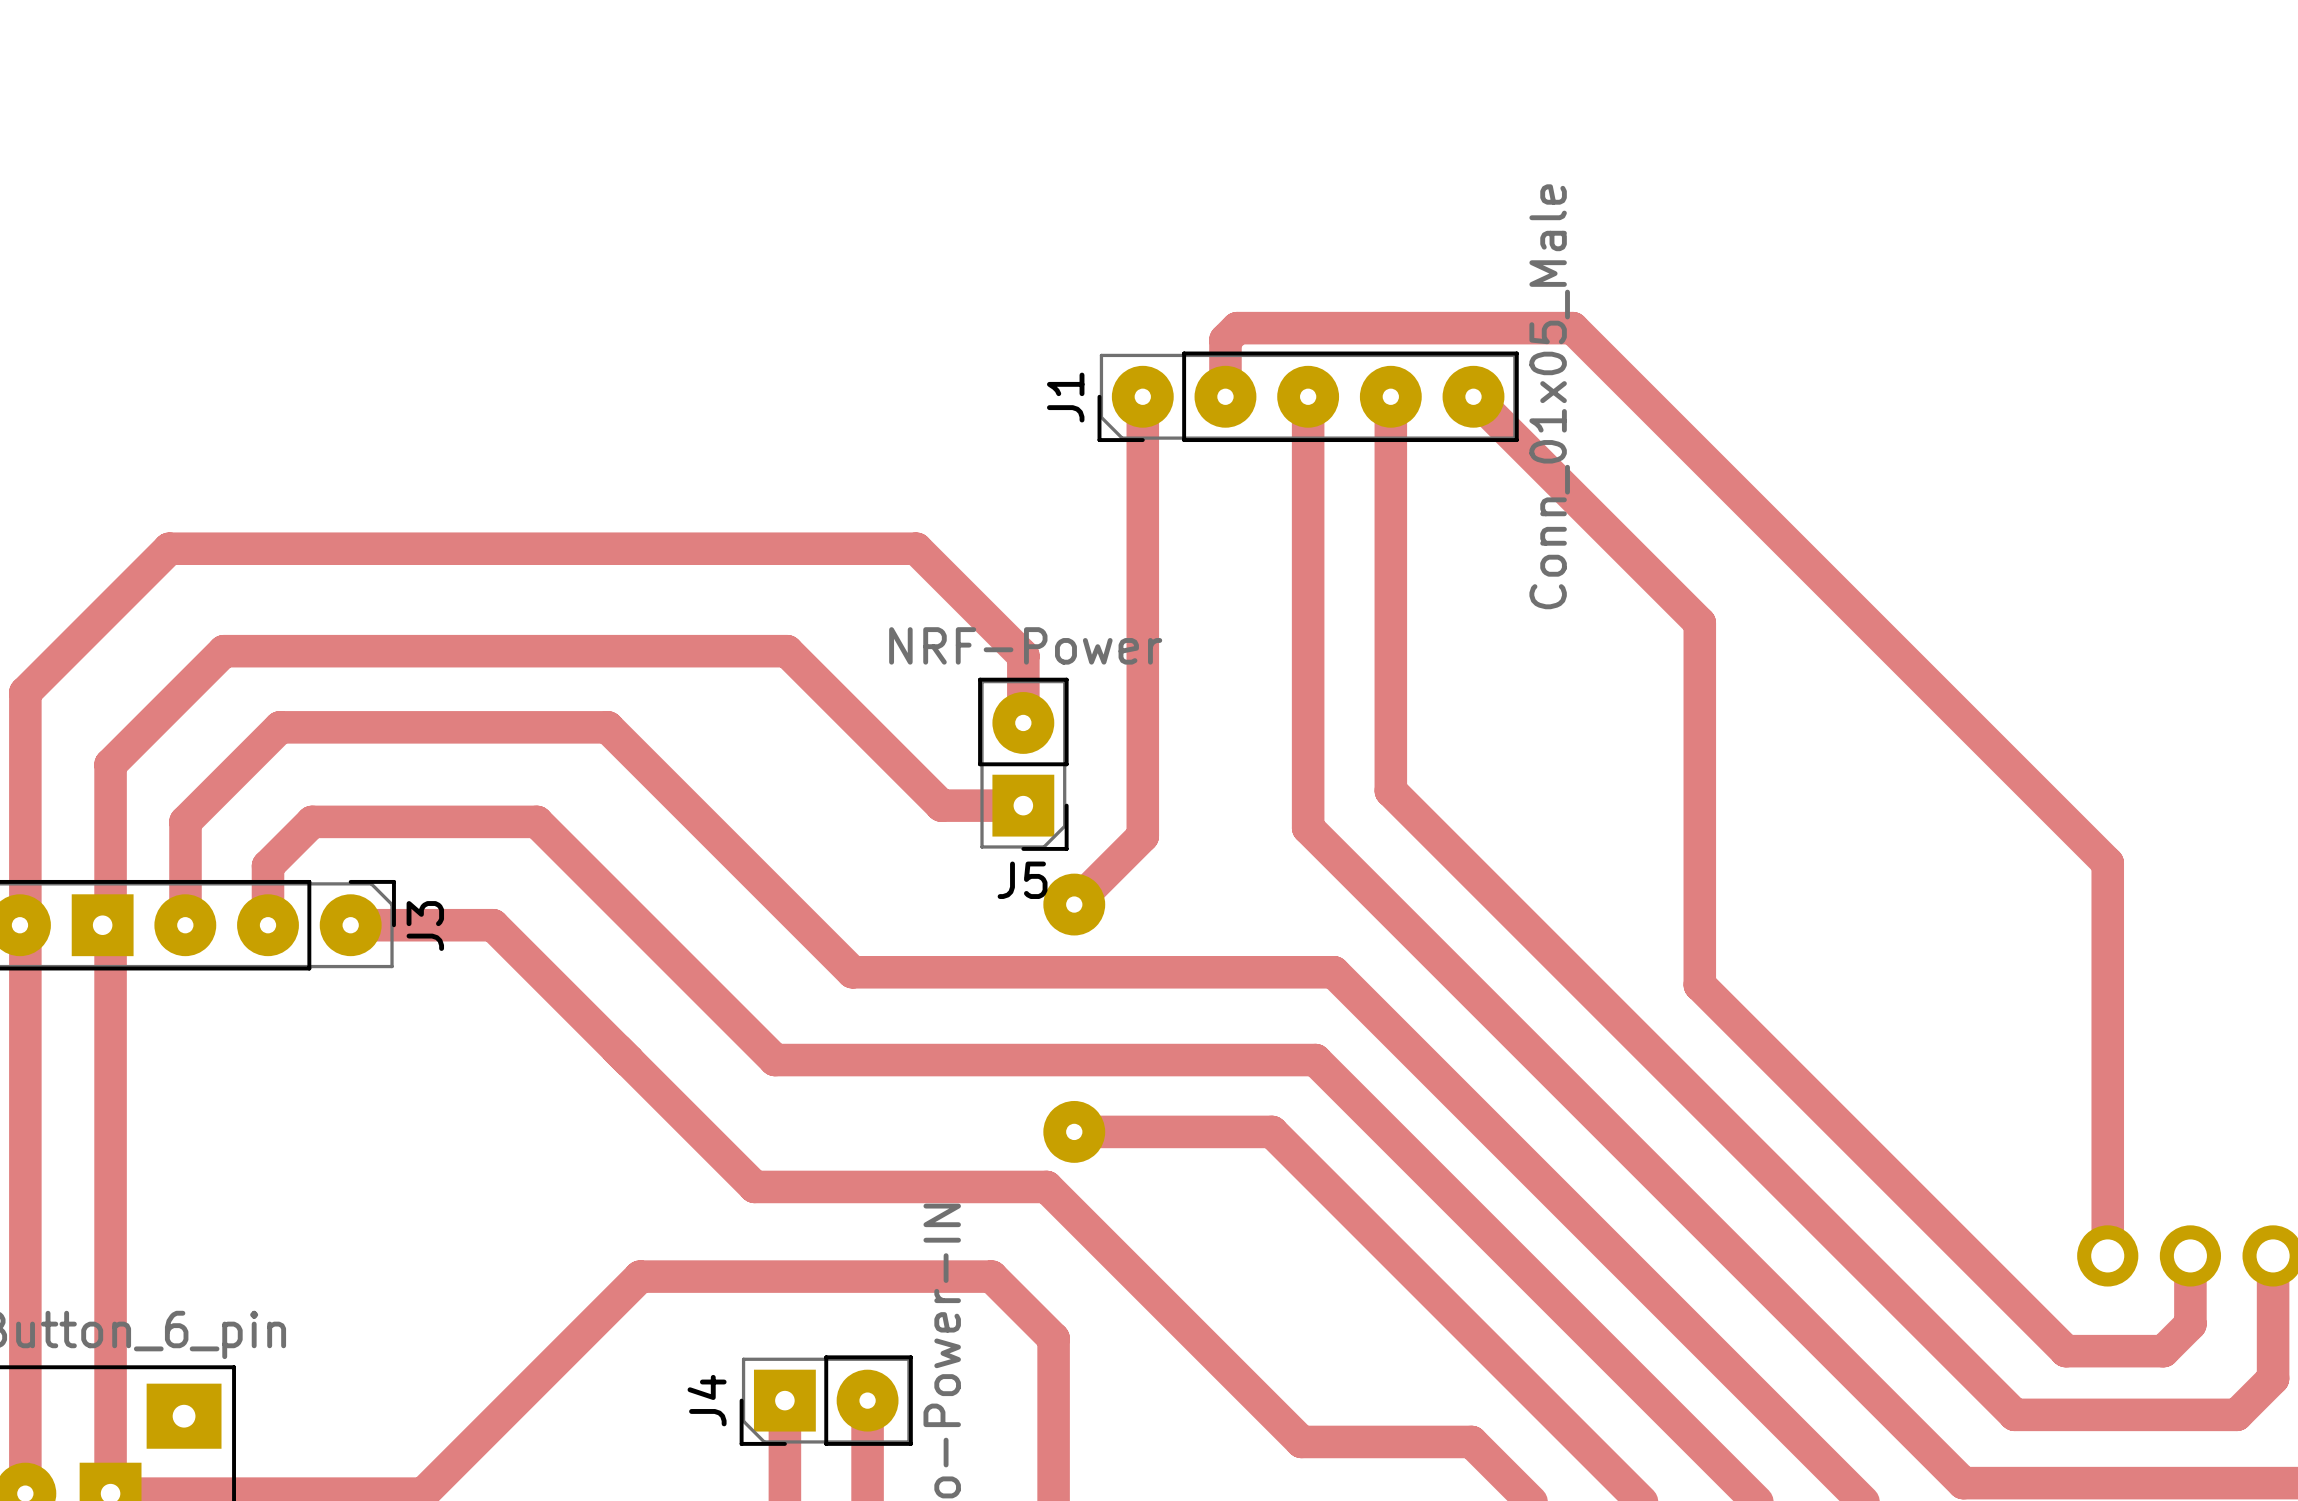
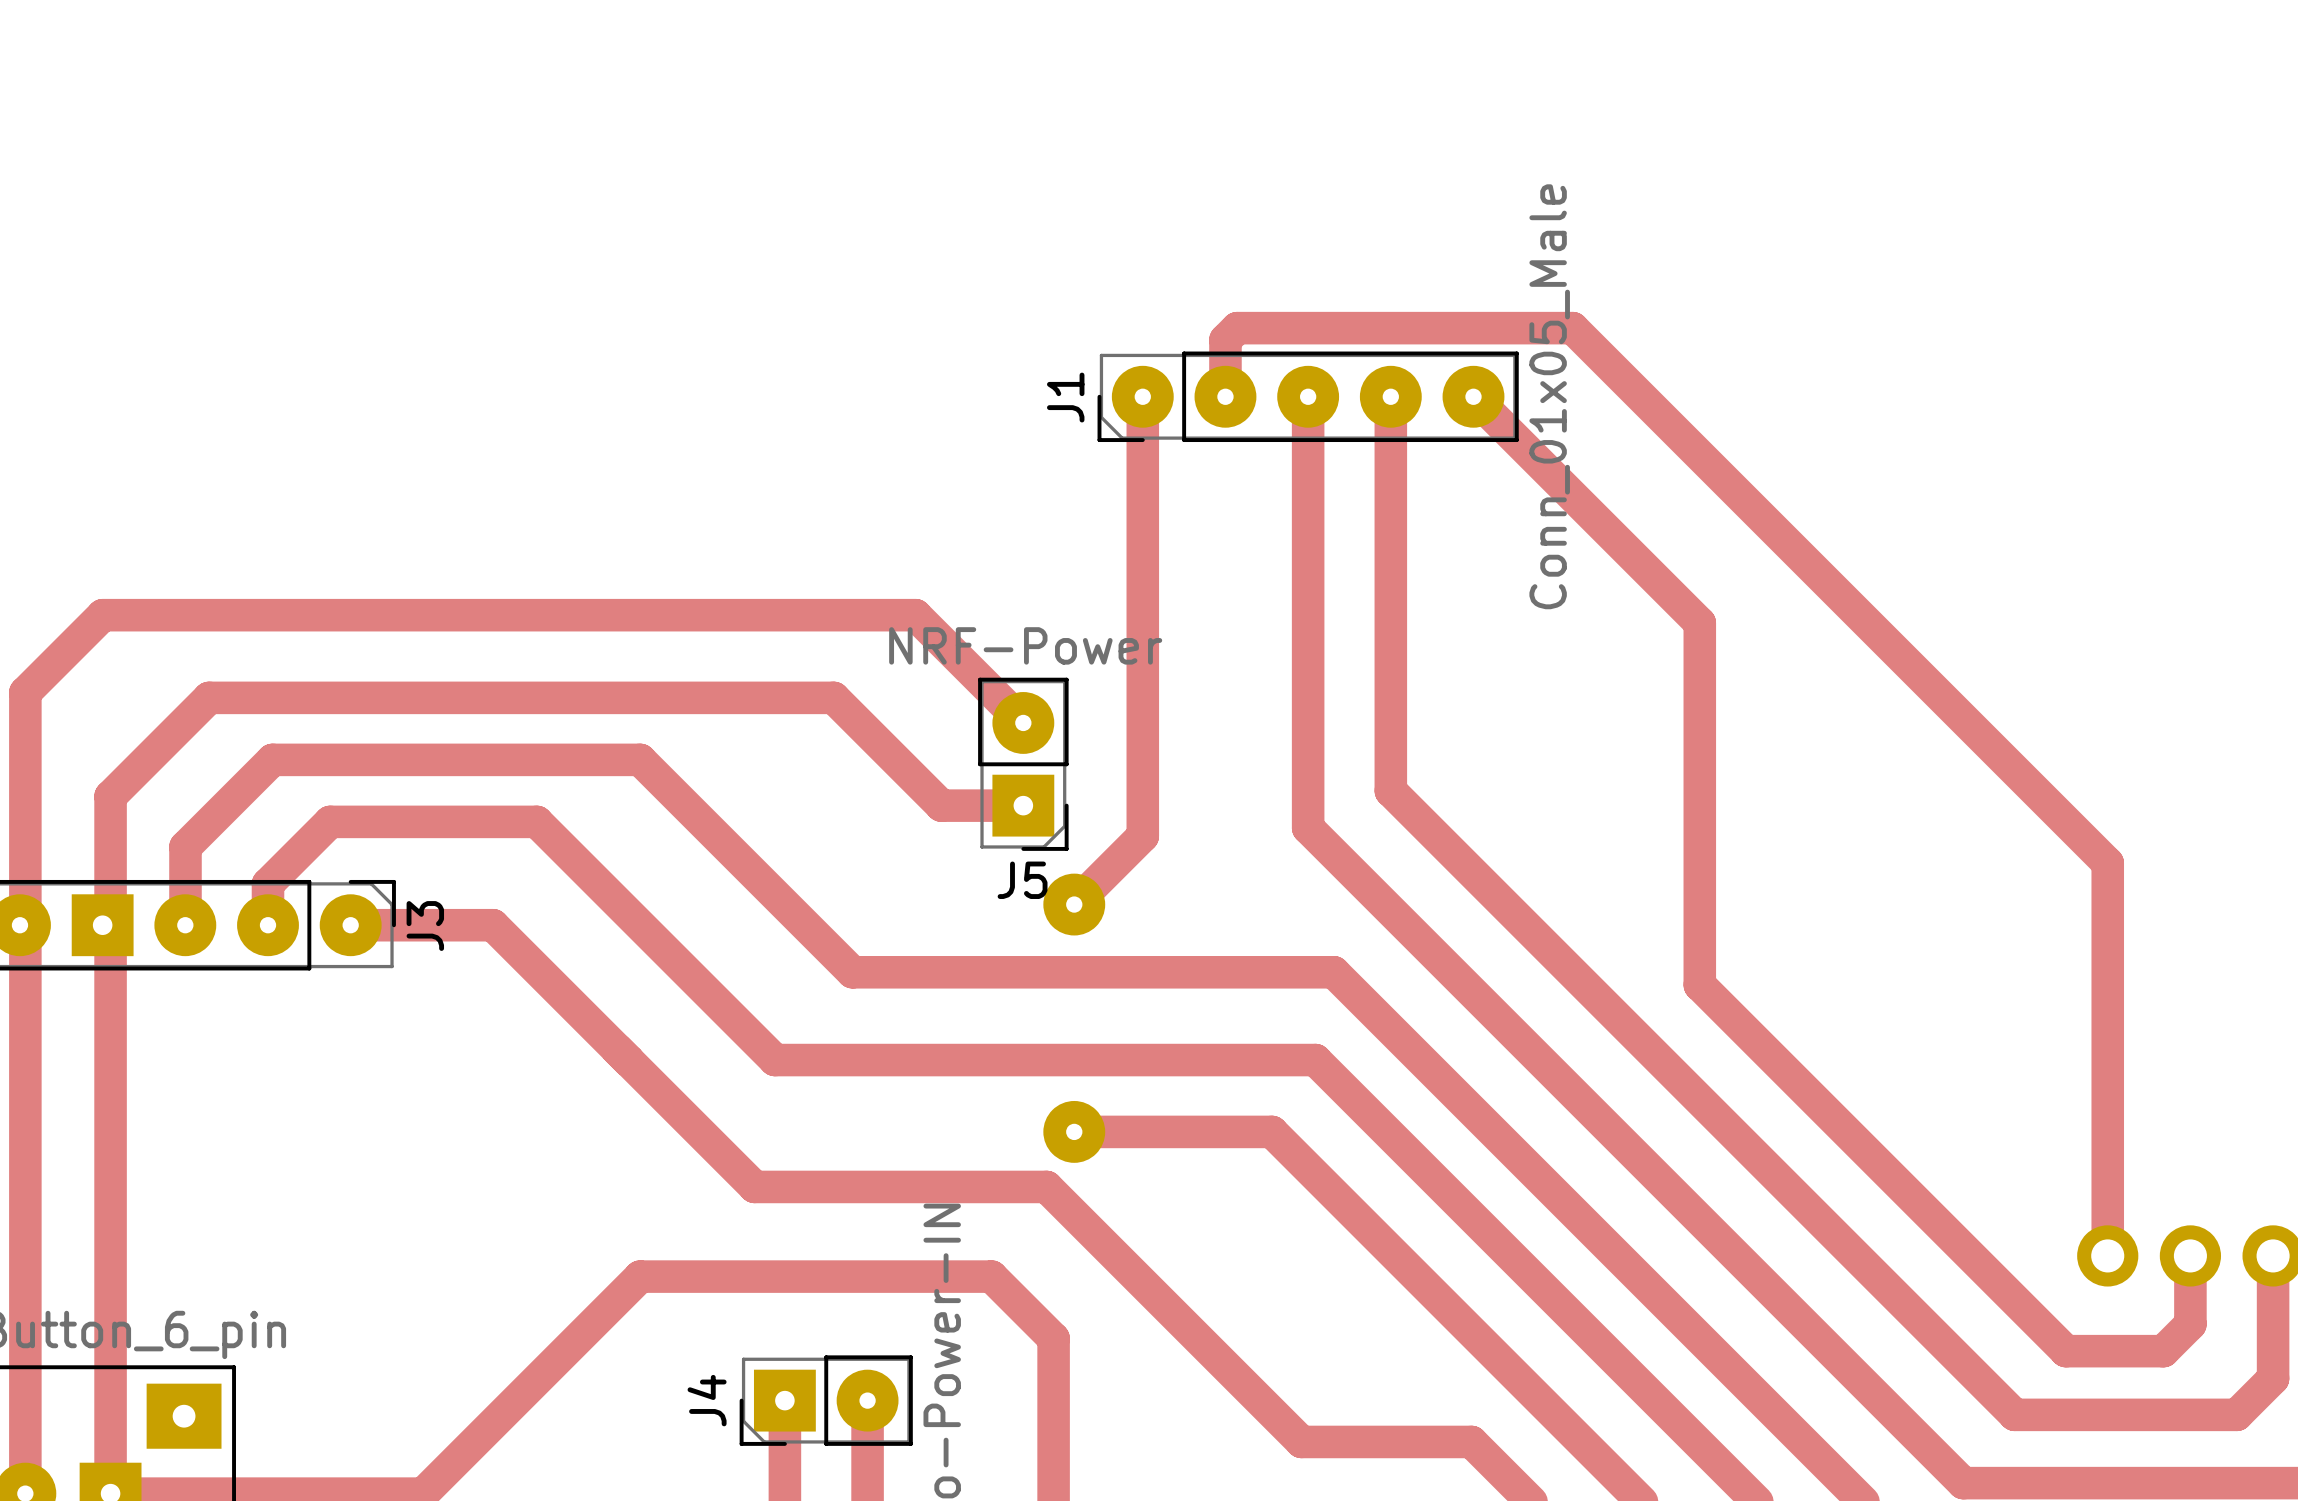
track: (102, 615) (169, 548) (916, 548) (1023, 655) (1023, 722) -> (102, 615) (915, 615) (1023, 722)
track: (833, 697) (787, 651) (223, 651) (110, 764) (110, 796) -> (833, 697) (209, 697) (110, 796)
track: (640, 759) (607, 727) (280, 727) (185, 821) (185, 846) -> (640, 759) (272, 759) (185, 846)
track: (330, 821) (312, 821) (268, 866) (268, 884) -> (330, 821) (268, 884)

